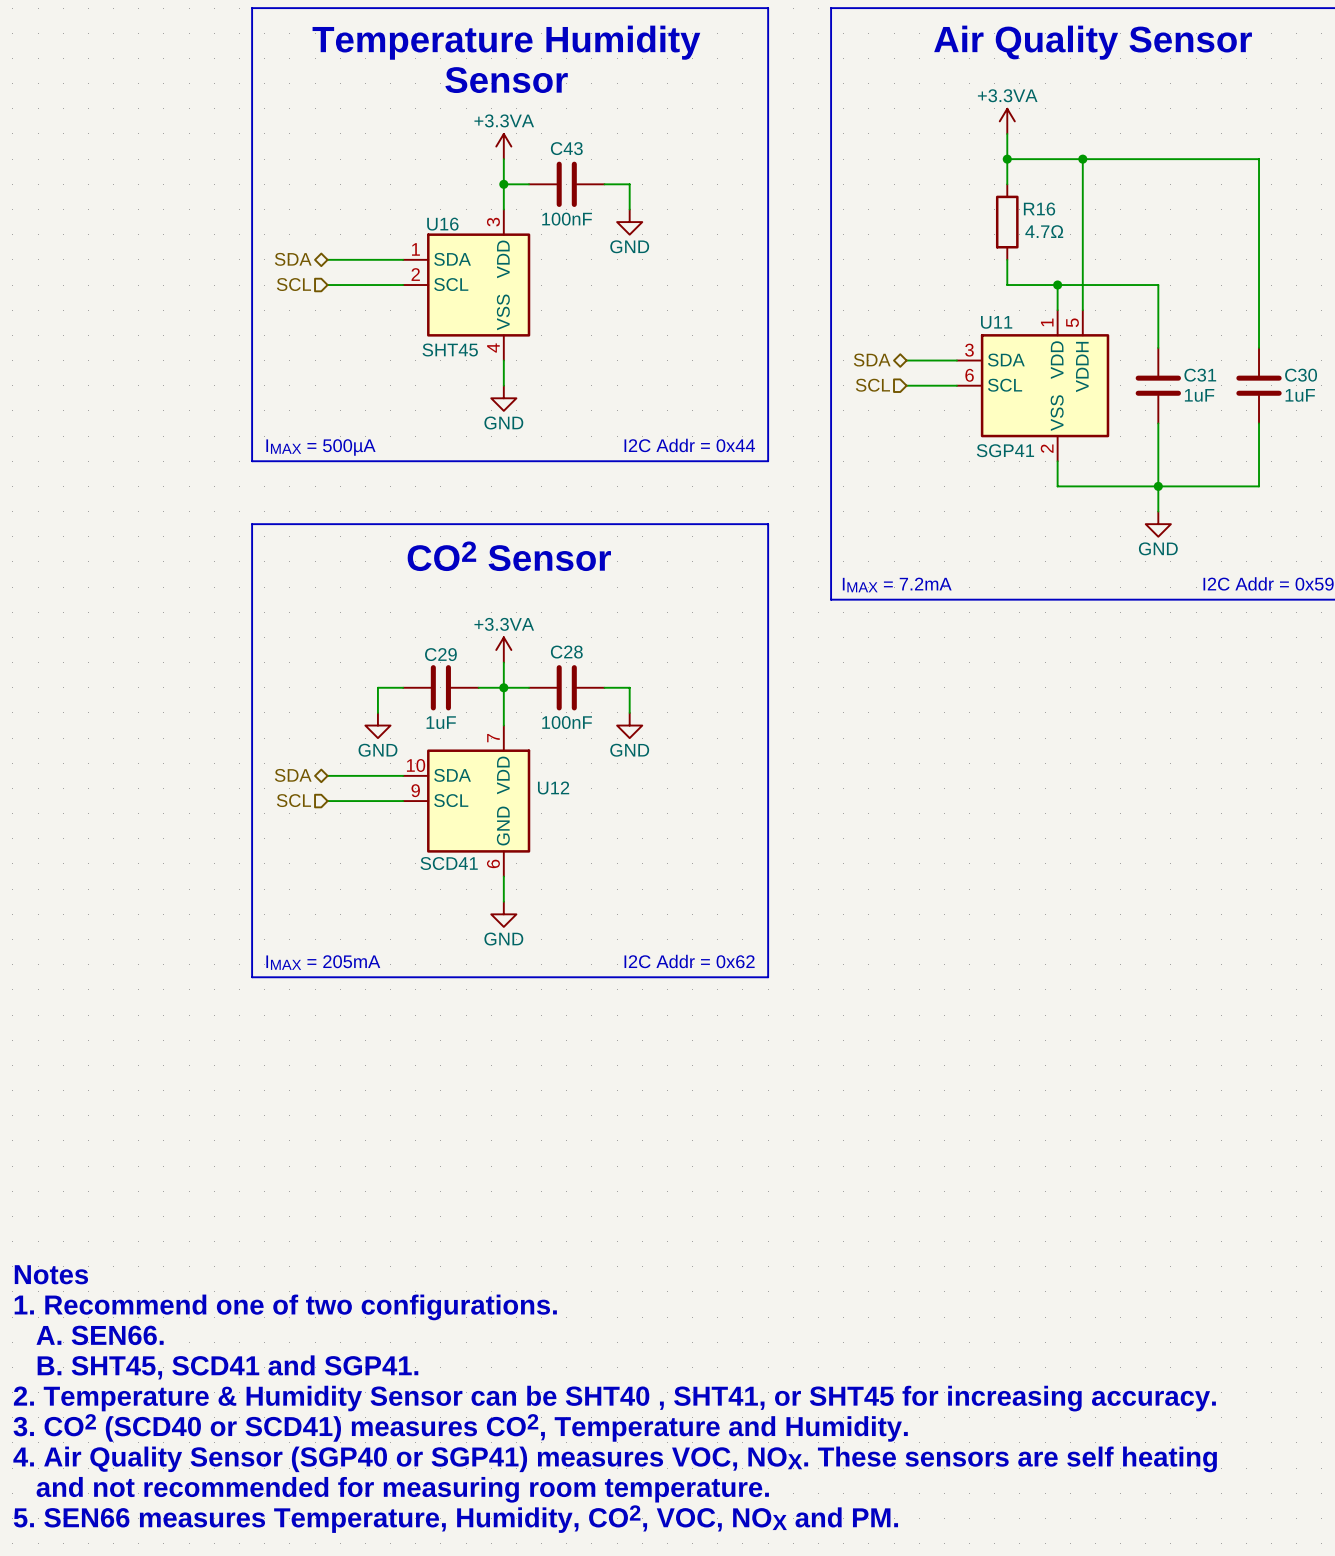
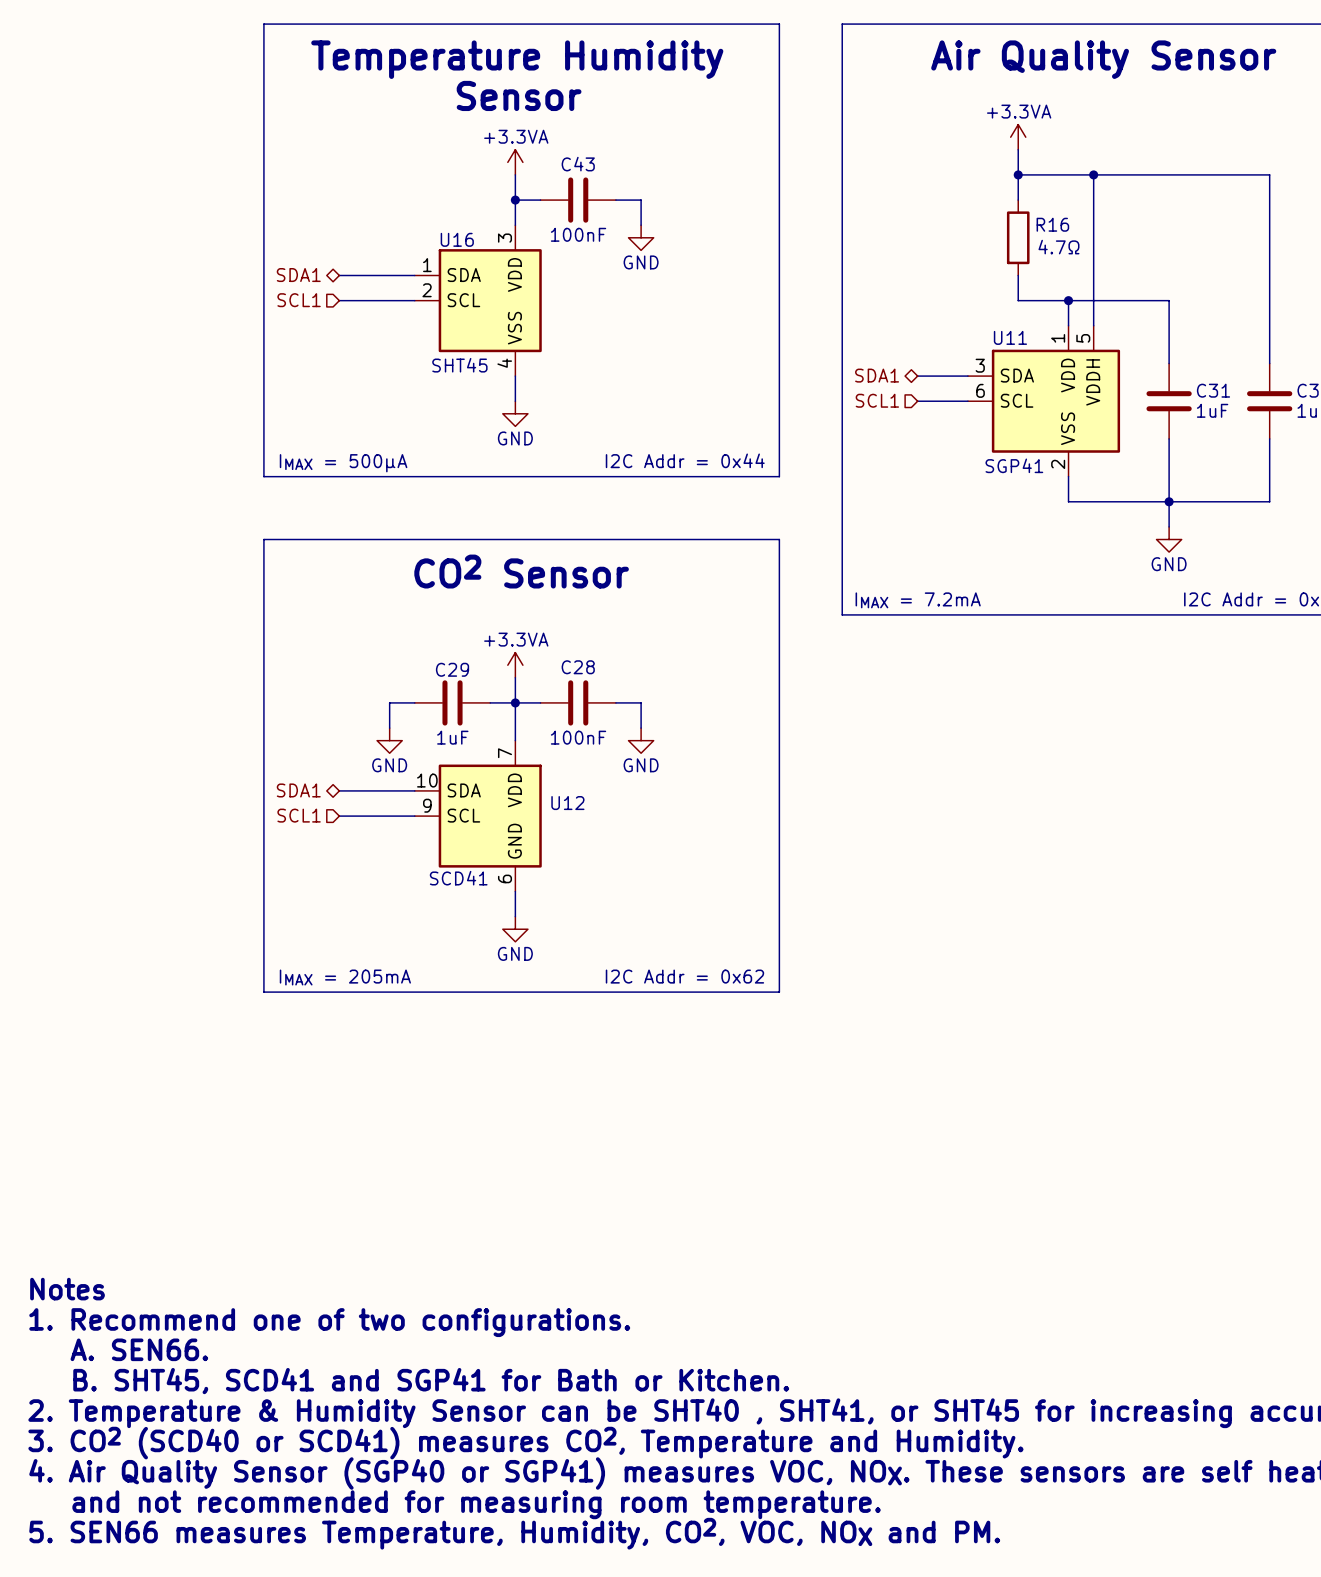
hierarchical label: SDA (293, 259) -> SDA1 (298, 275)
hierarchical label: SCL (293, 284) -> SCL1 (299, 300)
hierarchical label: SDA (872, 360) -> SDA1 (877, 375)
hierarchical label: SCL (872, 385) -> SCL1 (877, 400)
hierarchical label: SDA (293, 775) -> SDA1 (298, 790)
hierarchical label: SCL (293, 800) -> SCL1 (299, 815)
text: B. SHT45, SCD41 and SGP41. (227, 1367) -> B. SHT45, SCD41 and SGP41 for Bath or Kitchen. (431, 1381)

